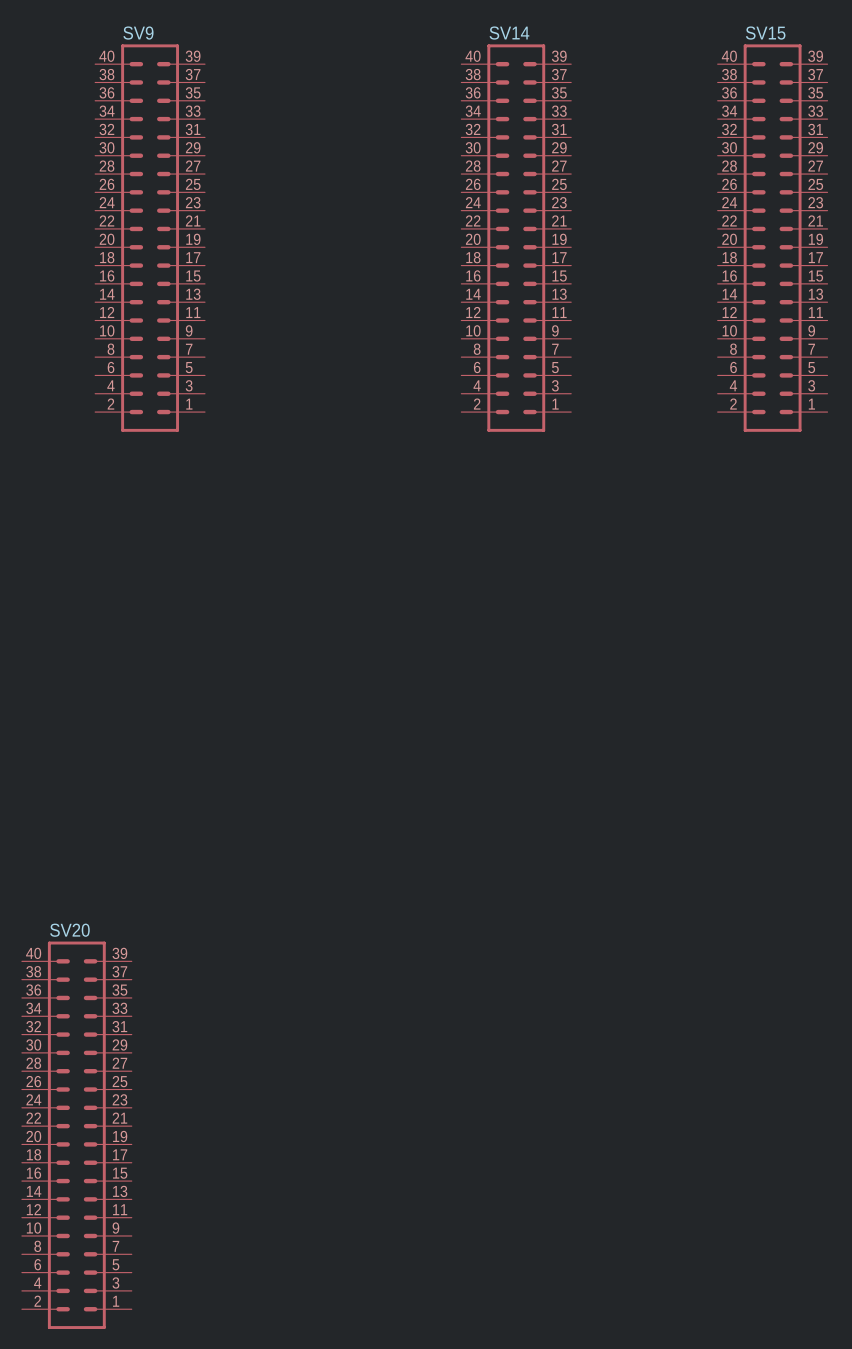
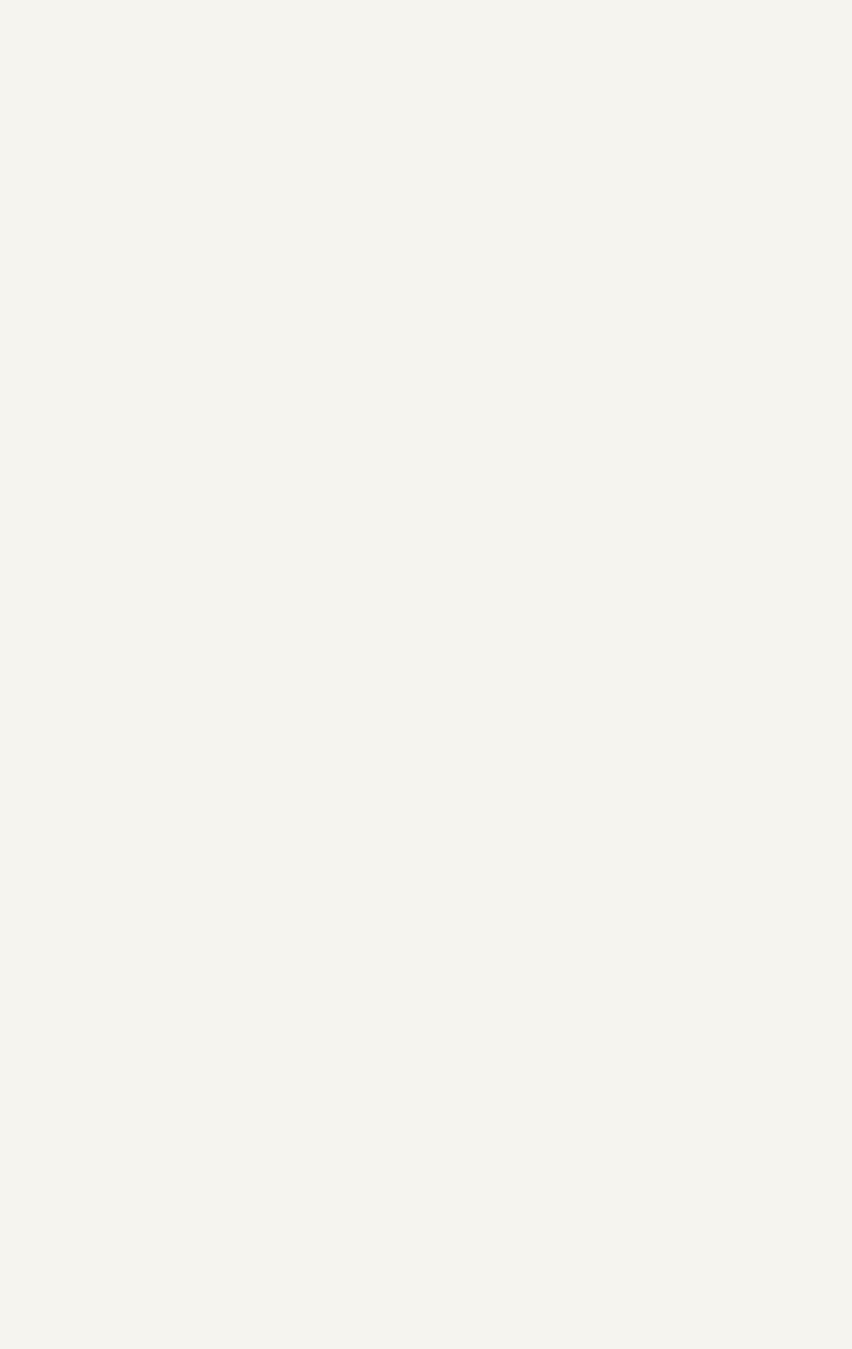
SV9: (150, 238) -> none
SV14: (516, 238) -> none
SV15: (772, 238) -> none
SV20: (76, 1135) -> none

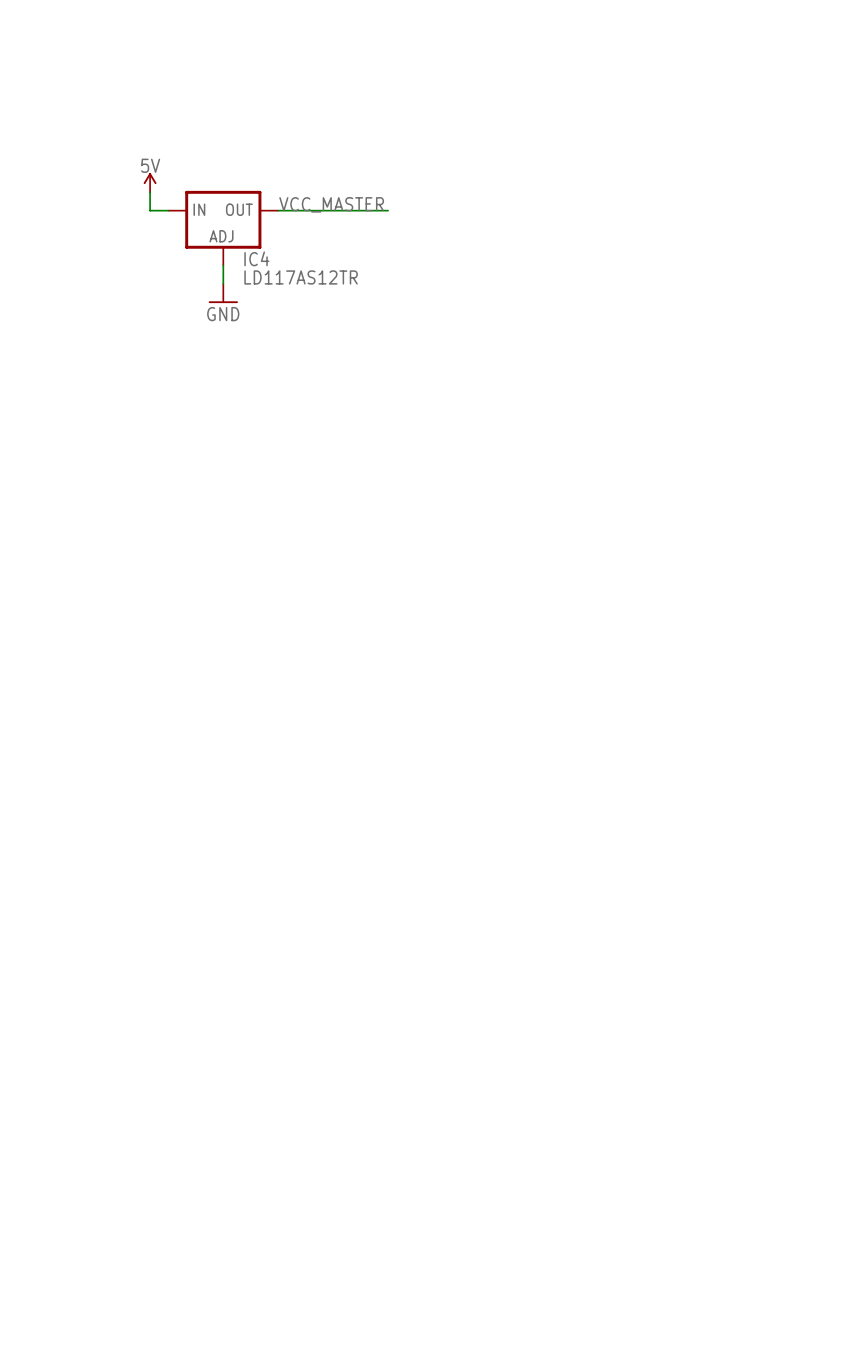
power symbol: none -> 5V (150, 182)
wire: none -> (150, 192) (150, 210) (168, 210)
label: none -> VCC_MASTER (331, 204)
wire: none -> (278, 210) (388, 210)
IC4: none -> LD117AS12TR (223, 228)
wire: none -> (223, 265) (223, 283)
power symbol: none -> GND (223, 293)

